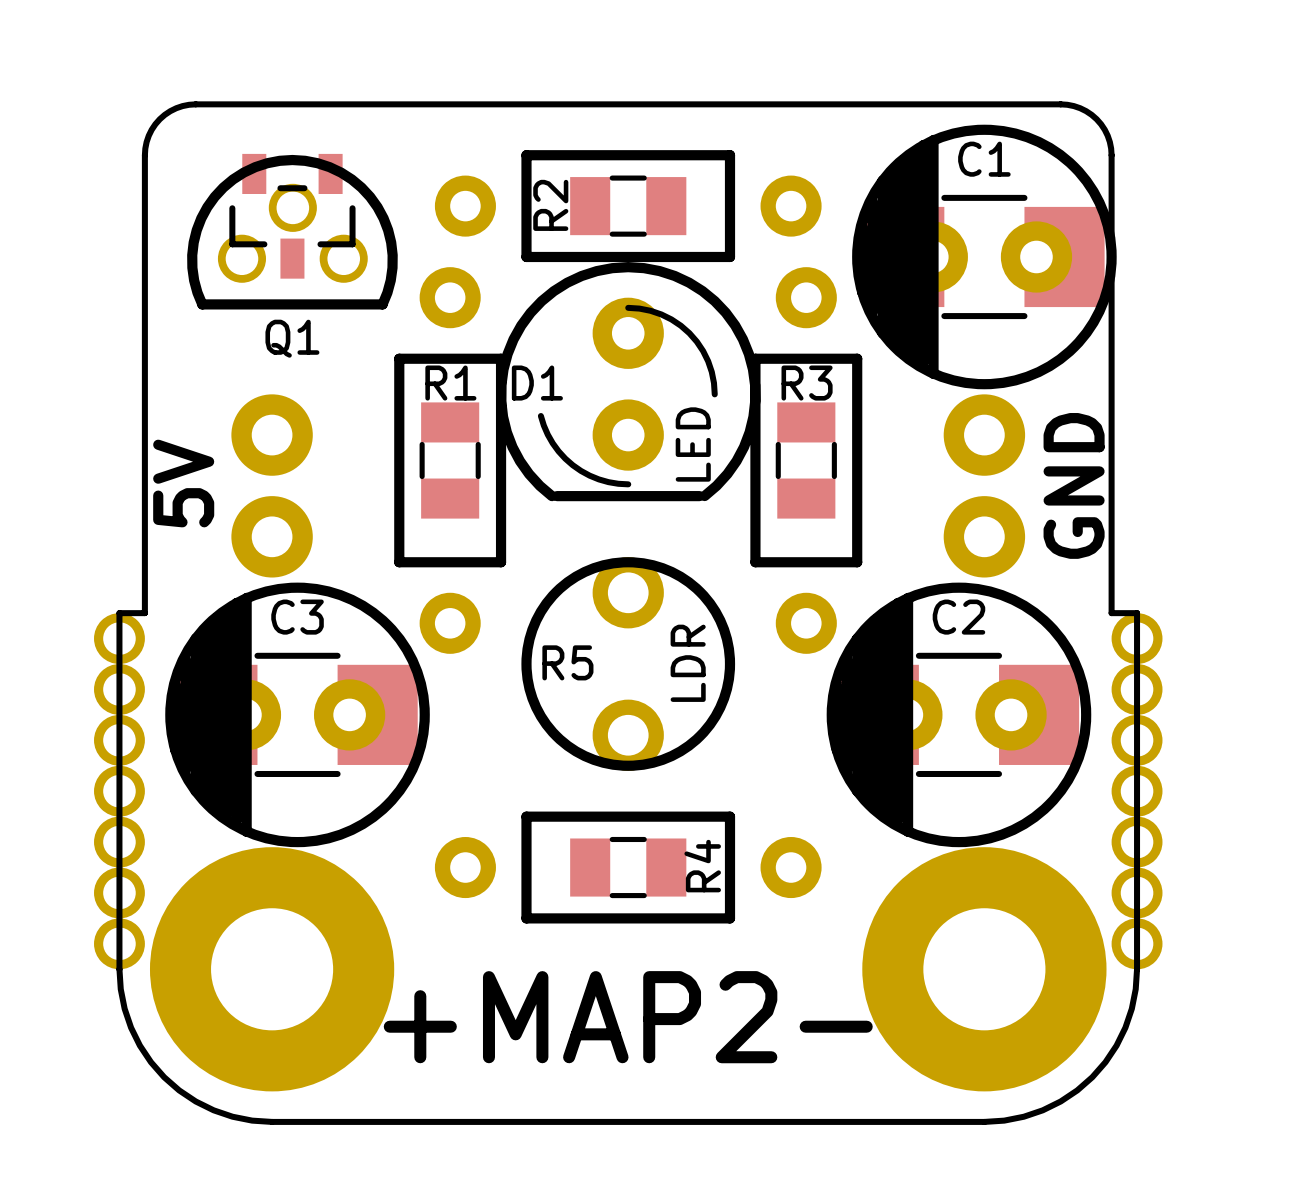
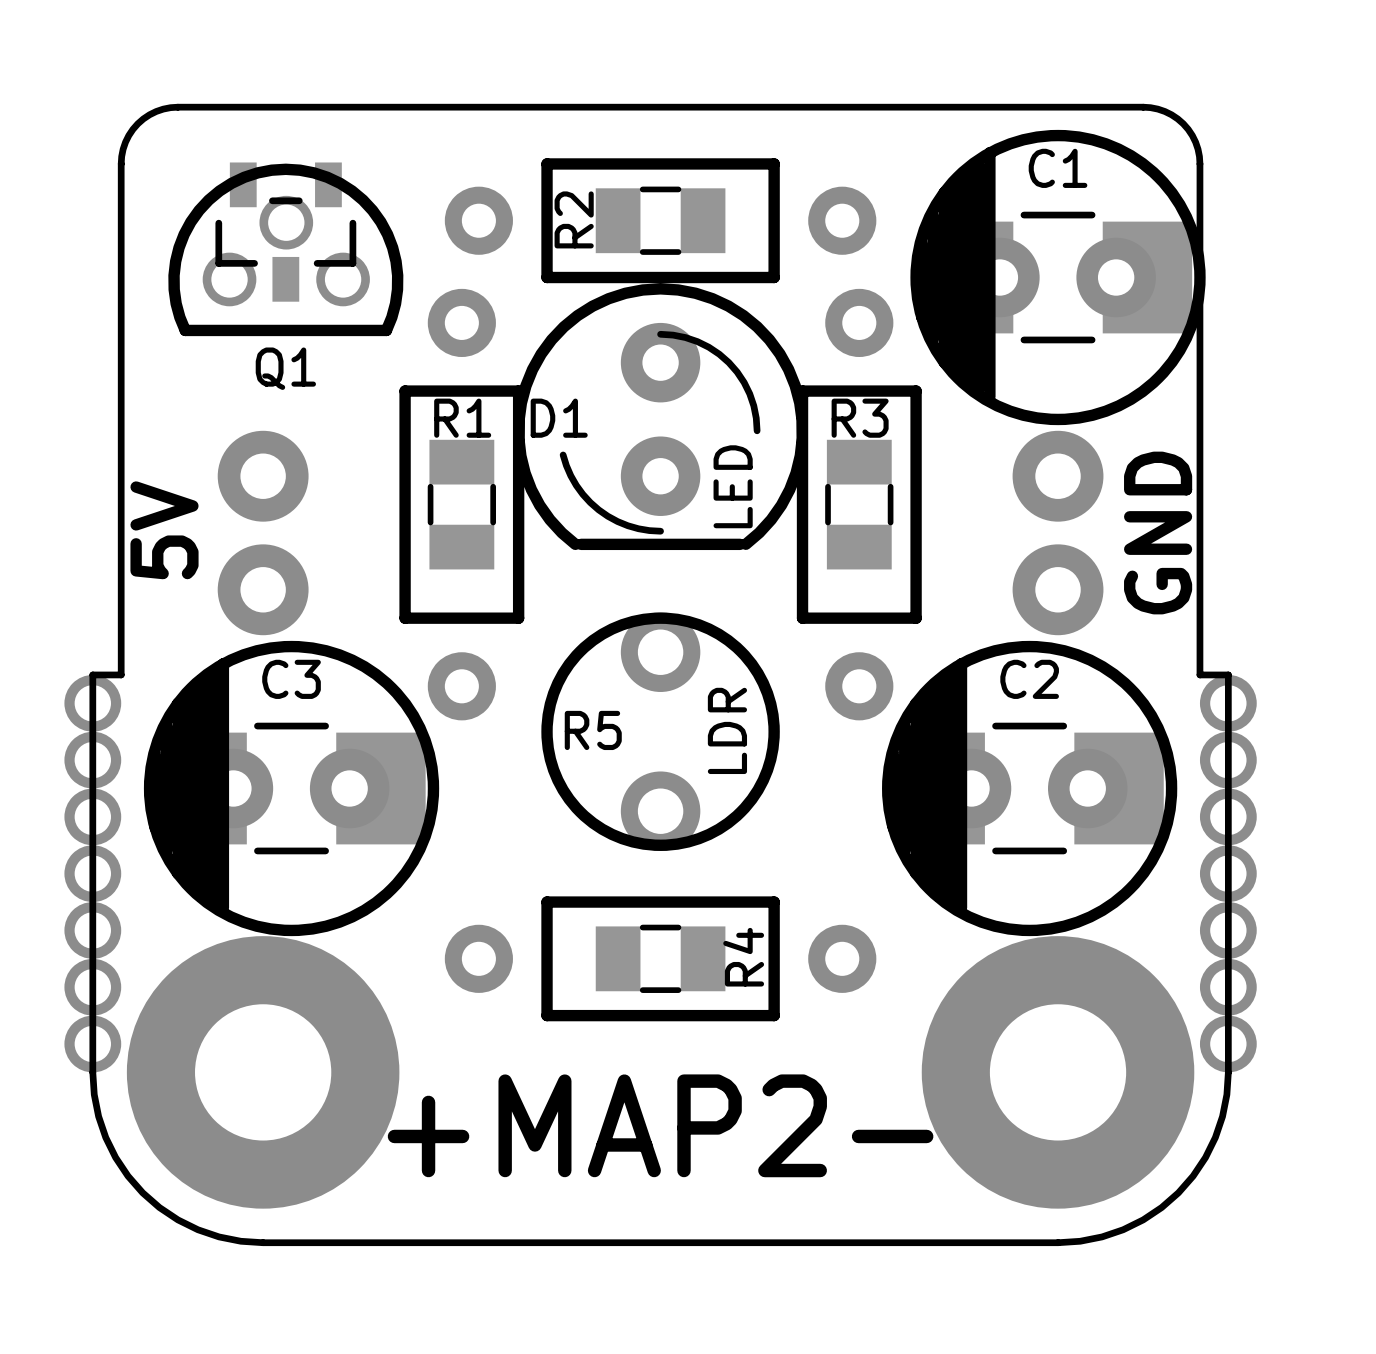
C1 footprint: [852, 124, 1117, 390] -> [910, 129, 1206, 426]
C3 footprint: [165, 582, 430, 848] -> [143, 640, 440, 937]
C2 footprint: [826, 582, 1092, 848] -> [882, 640, 1178, 937]

